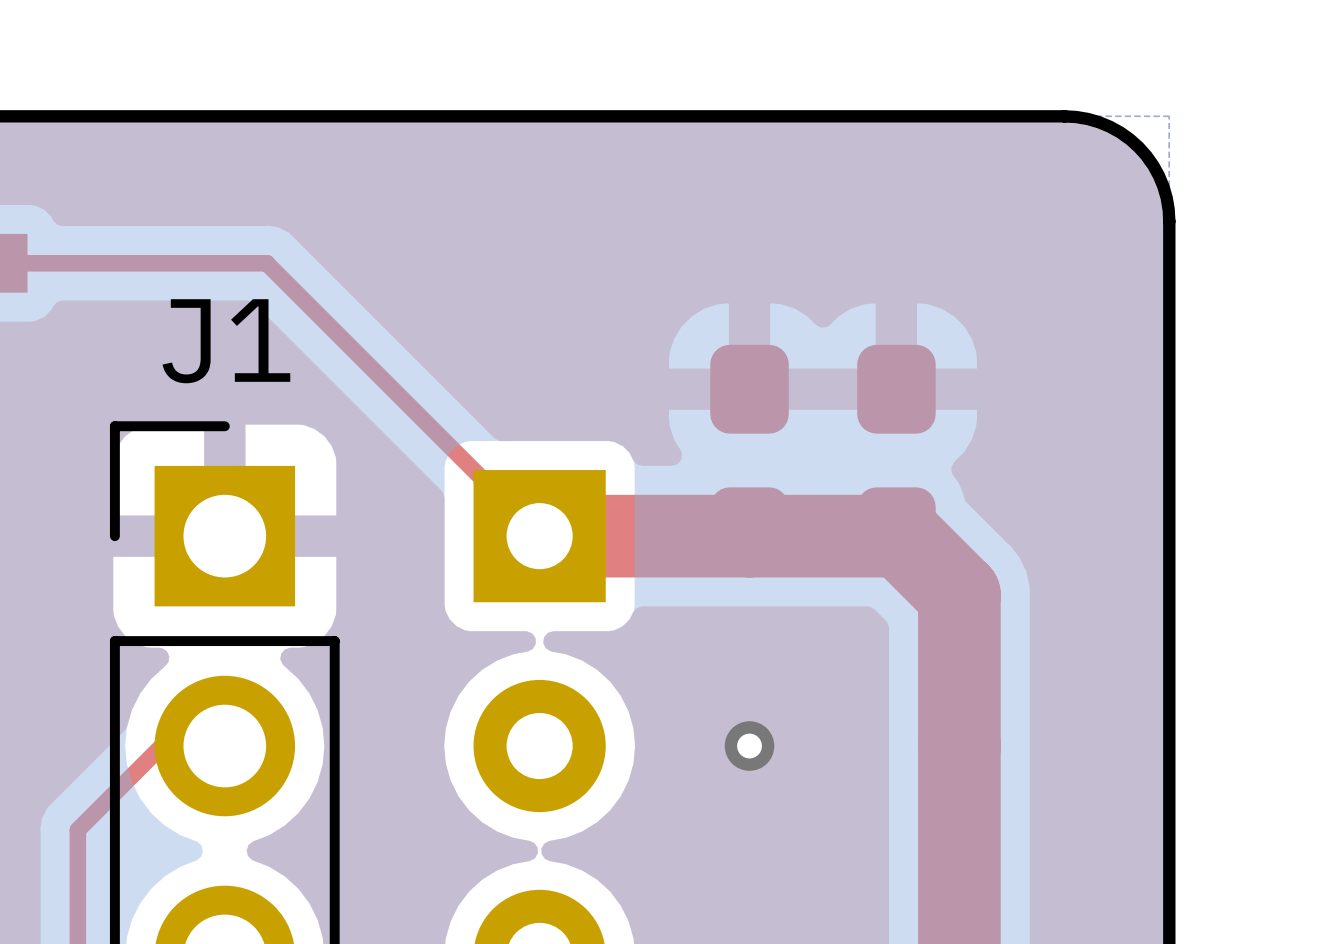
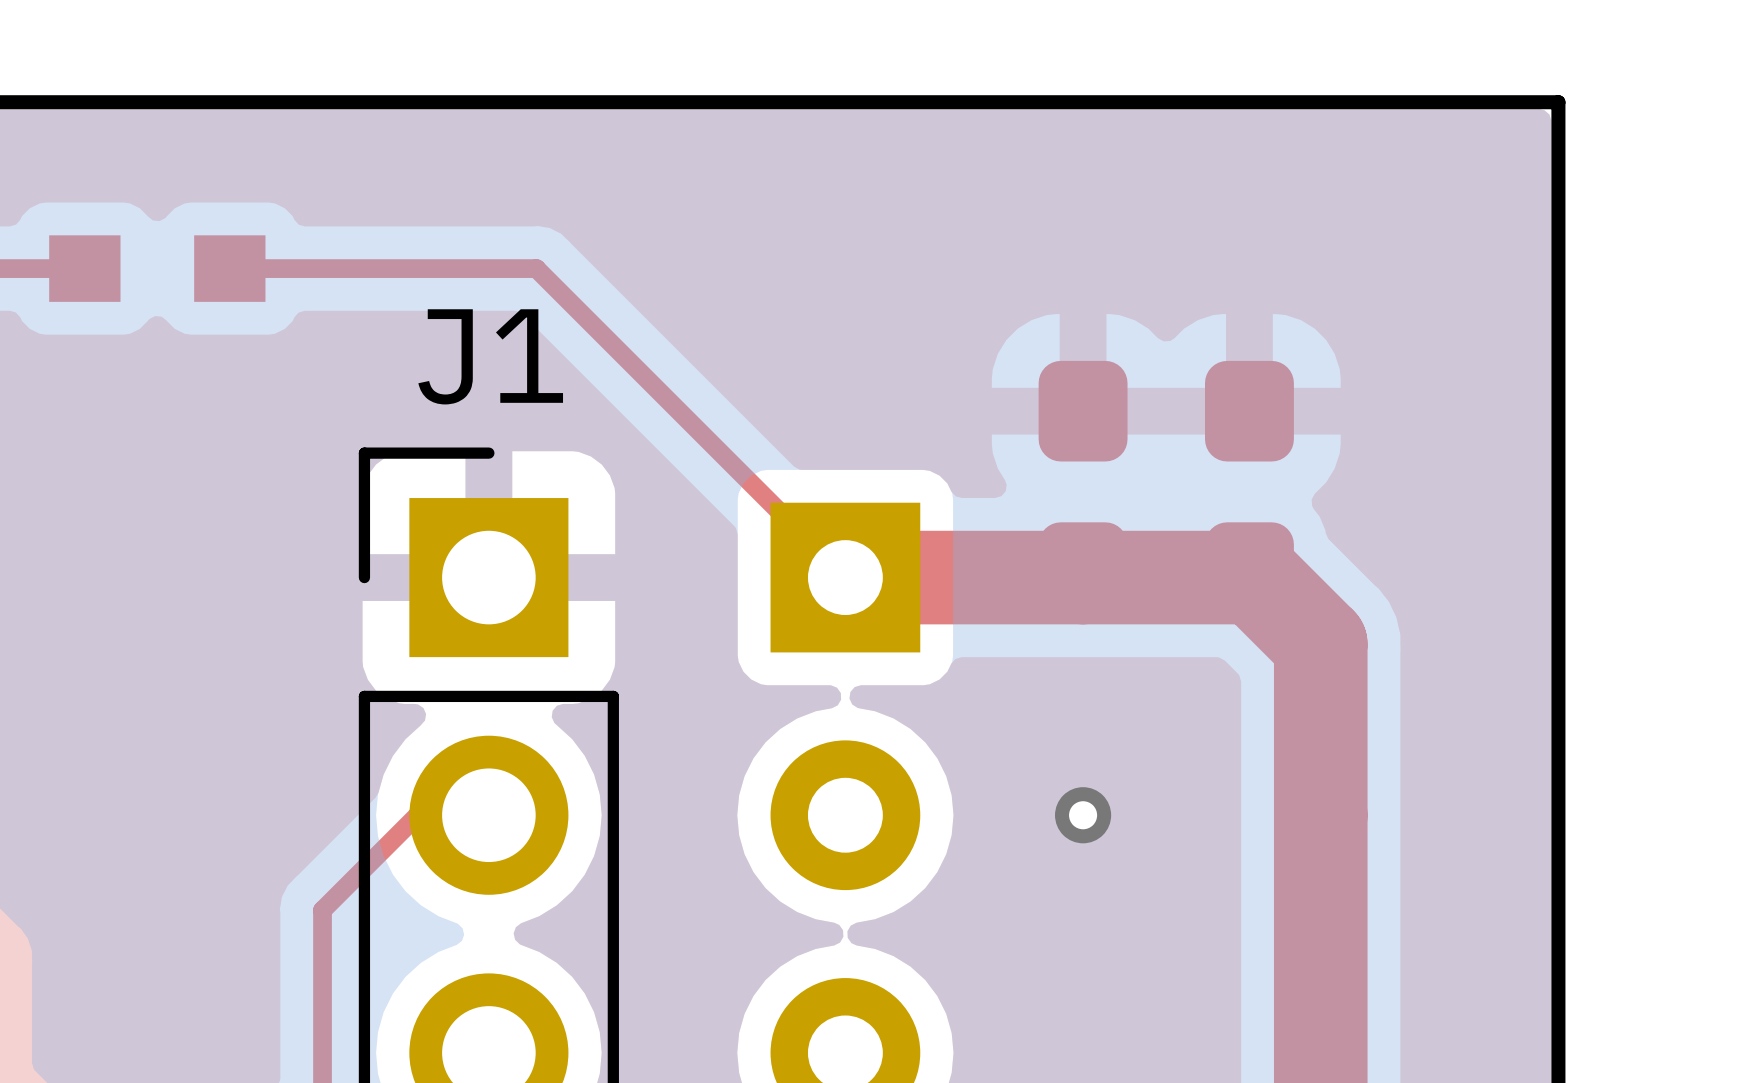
board edge: (1064, 116) (1099, 122) (1120, 132) (1138, 147) (1158, 175) (1166, 197) (1169, 221) -> (1439, 102) (1558, 102) (1558, 221)

